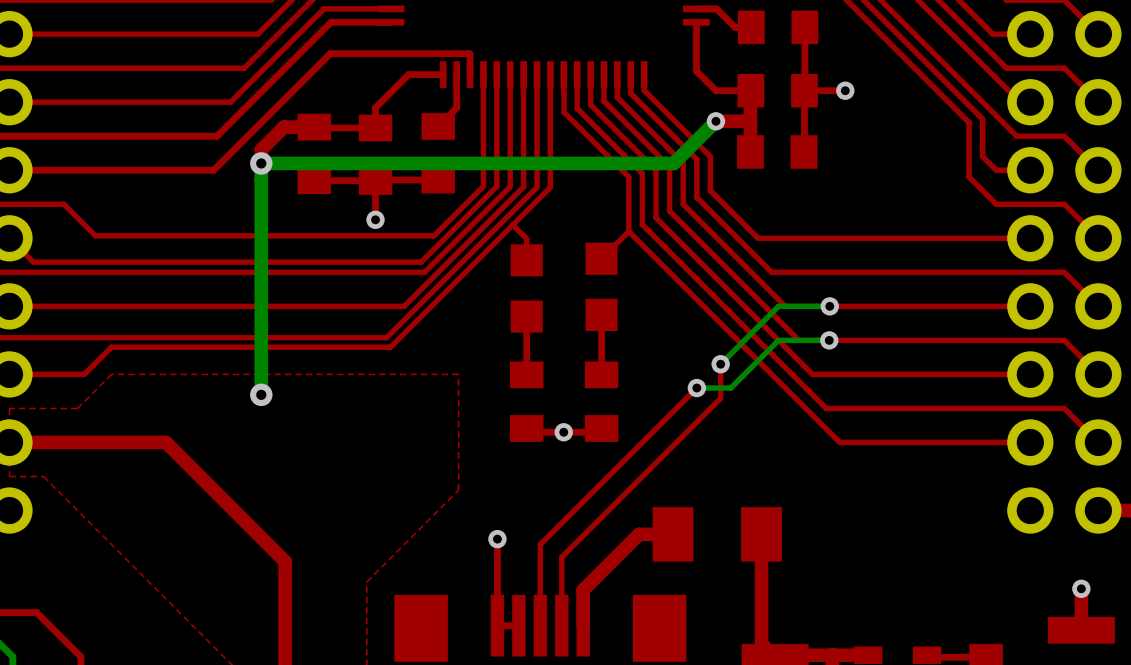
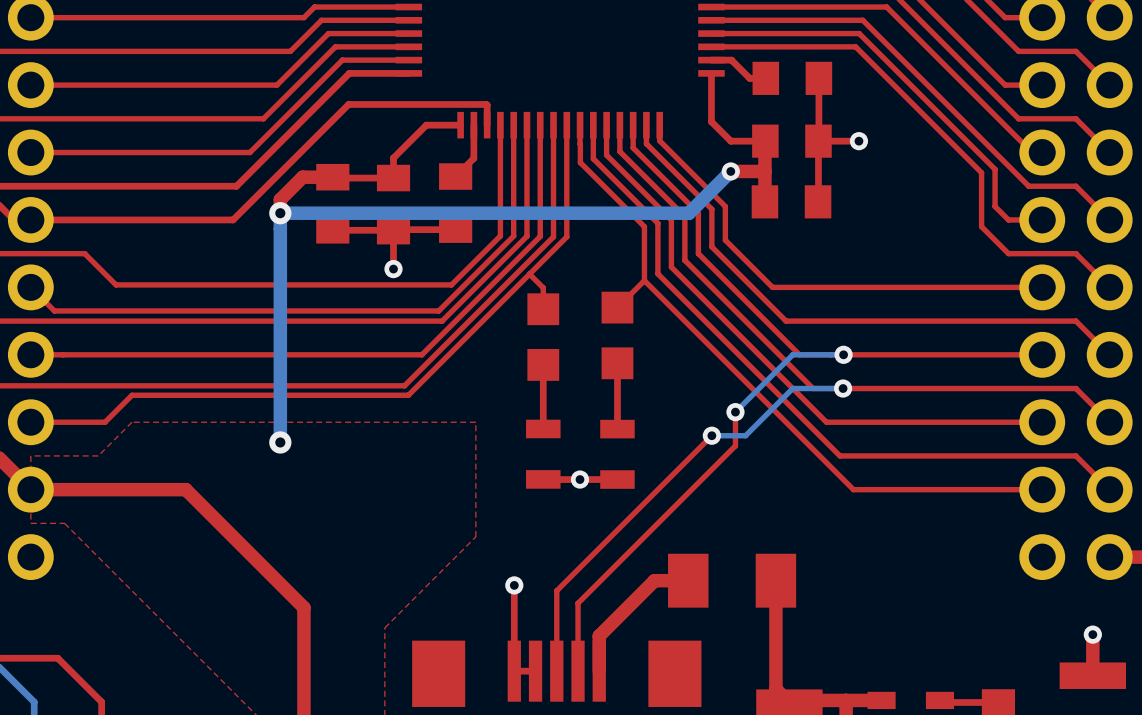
part footprint: [509, 361, 544, 442] -> [526, 419, 561, 489]
part footprint: [584, 361, 619, 442] -> [600, 419, 635, 489]

